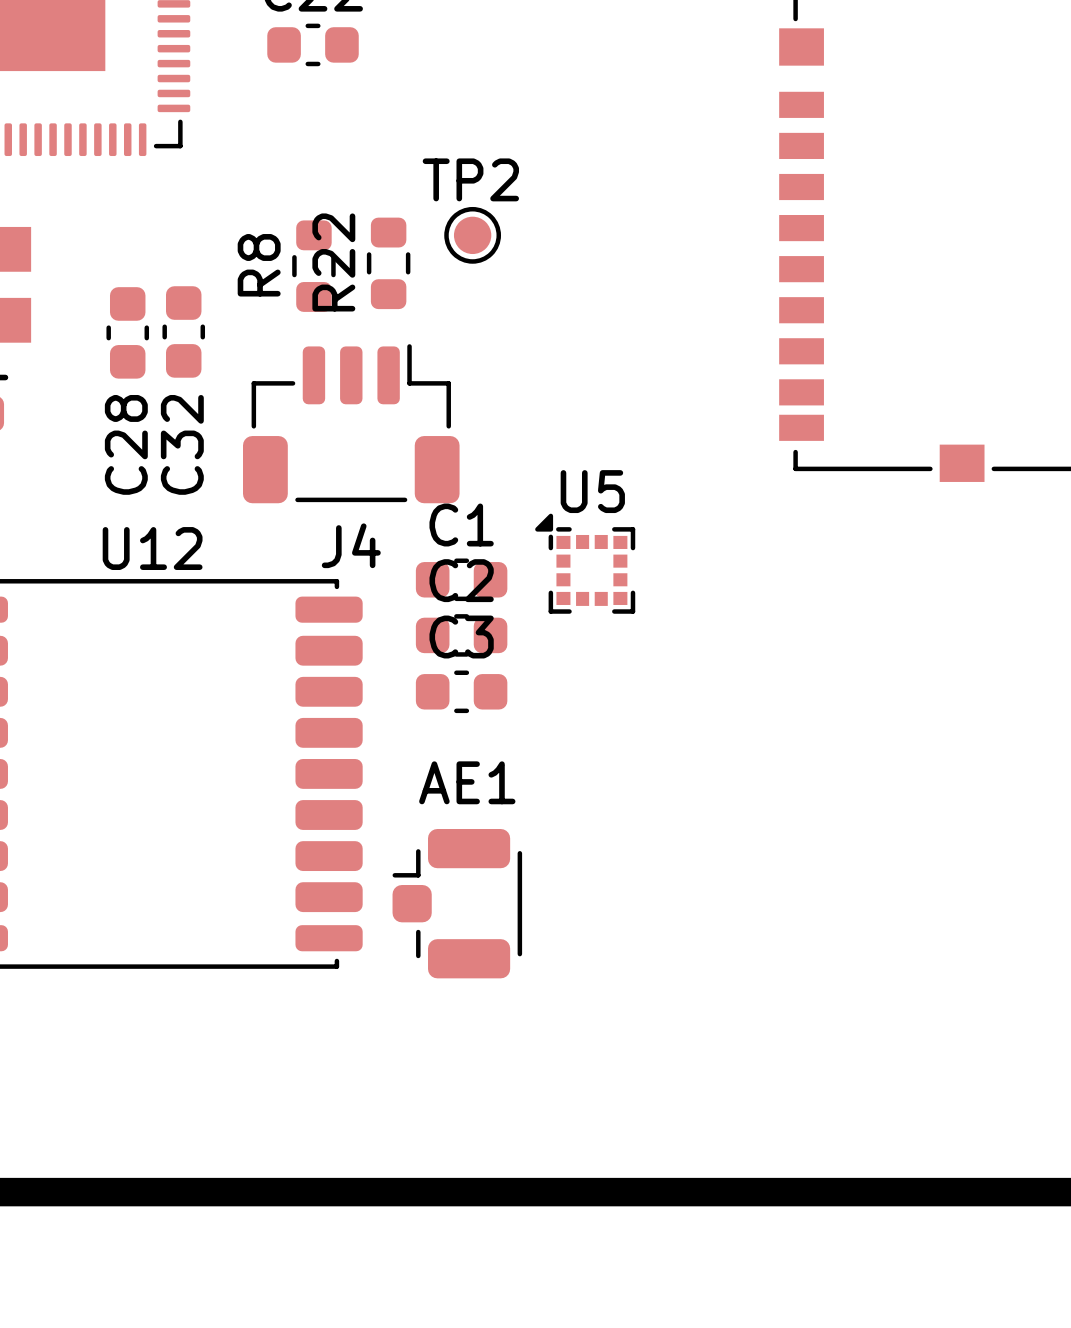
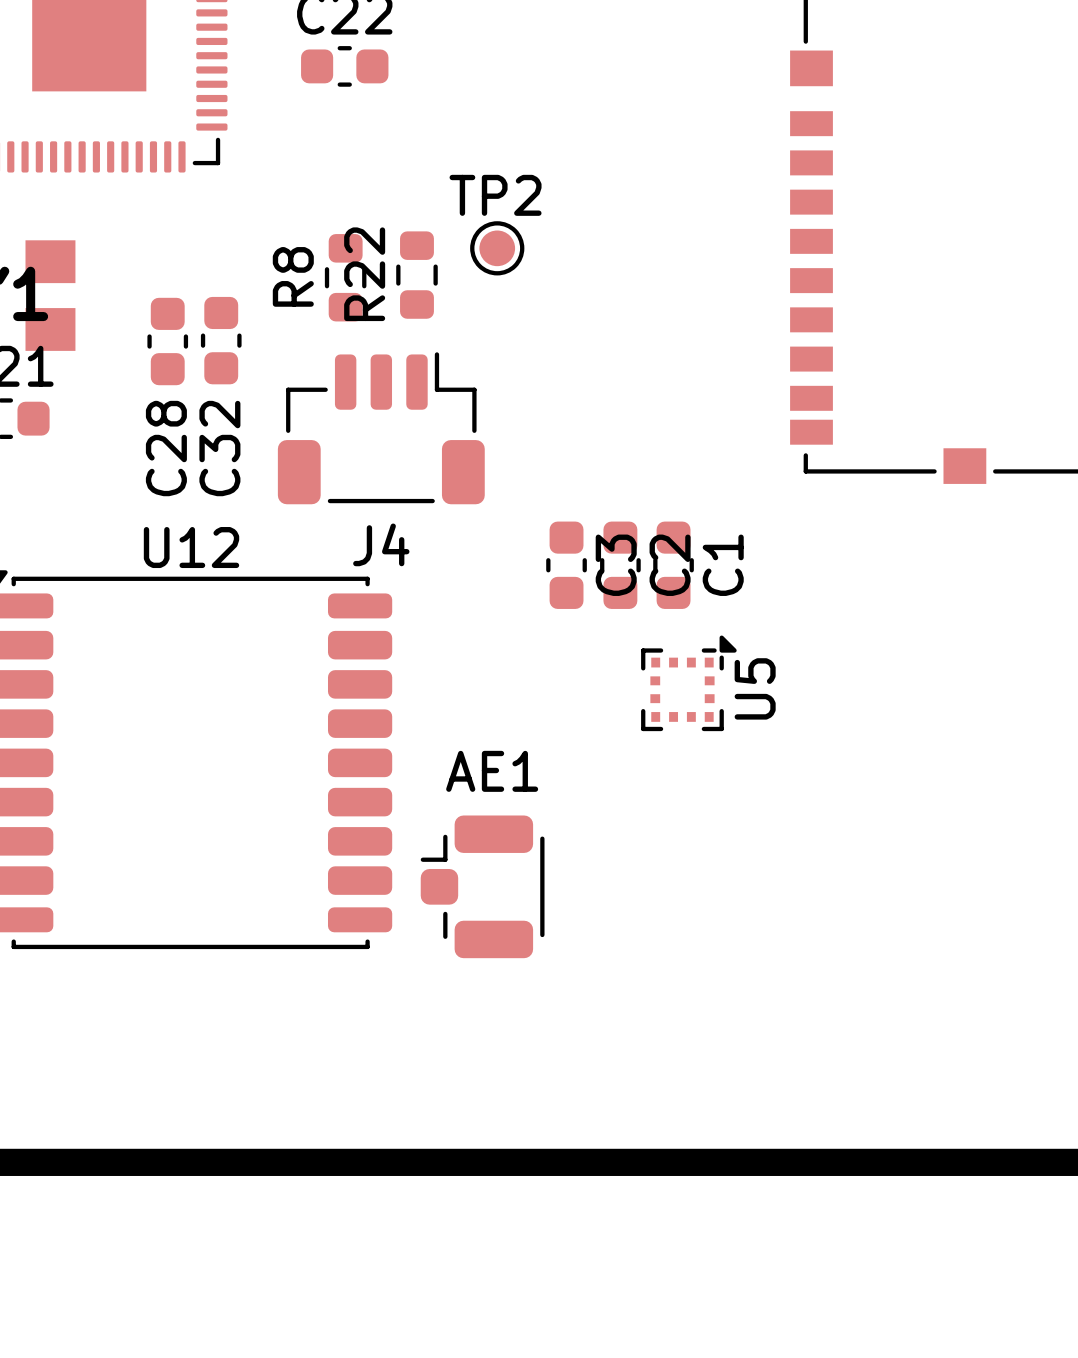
U5 name position: U5 (592, 491) -> U5 (755, 688)
U5 footprint: [535, 513, 636, 614] -> [641, 635, 737, 732]
C1 rotation: 0° (461, 579) -> 90° clockwise (673, 565)
C1 position: (461, 579) -> (673, 565)
C2 rotation: 0° (461, 635) -> 90° clockwise (620, 565)
C2 position: (461, 635) -> (620, 565)
C3 rotation: 0° (461, 691) -> 90° clockwise (566, 565)
C3 position: (461, 691) -> (566, 565)

